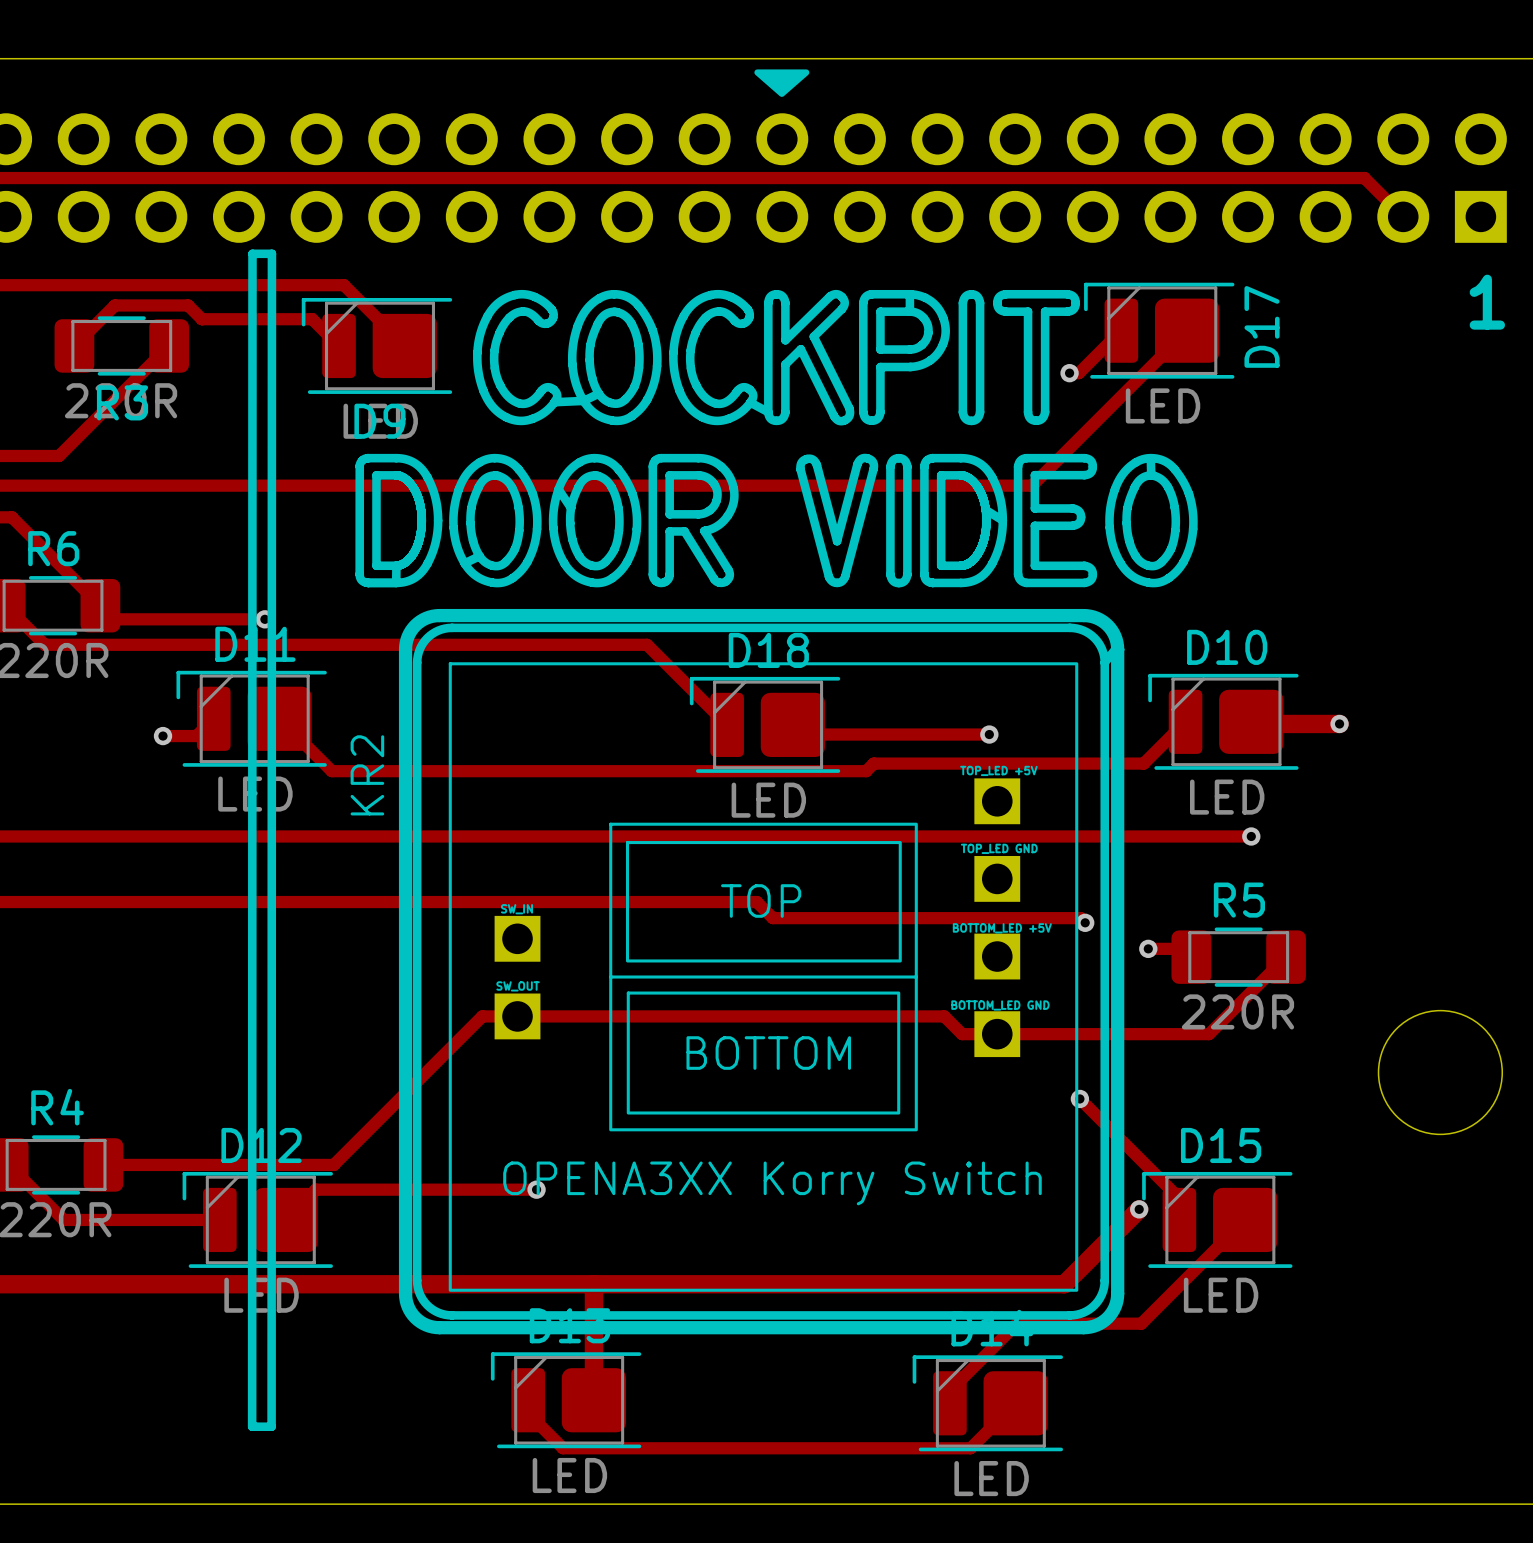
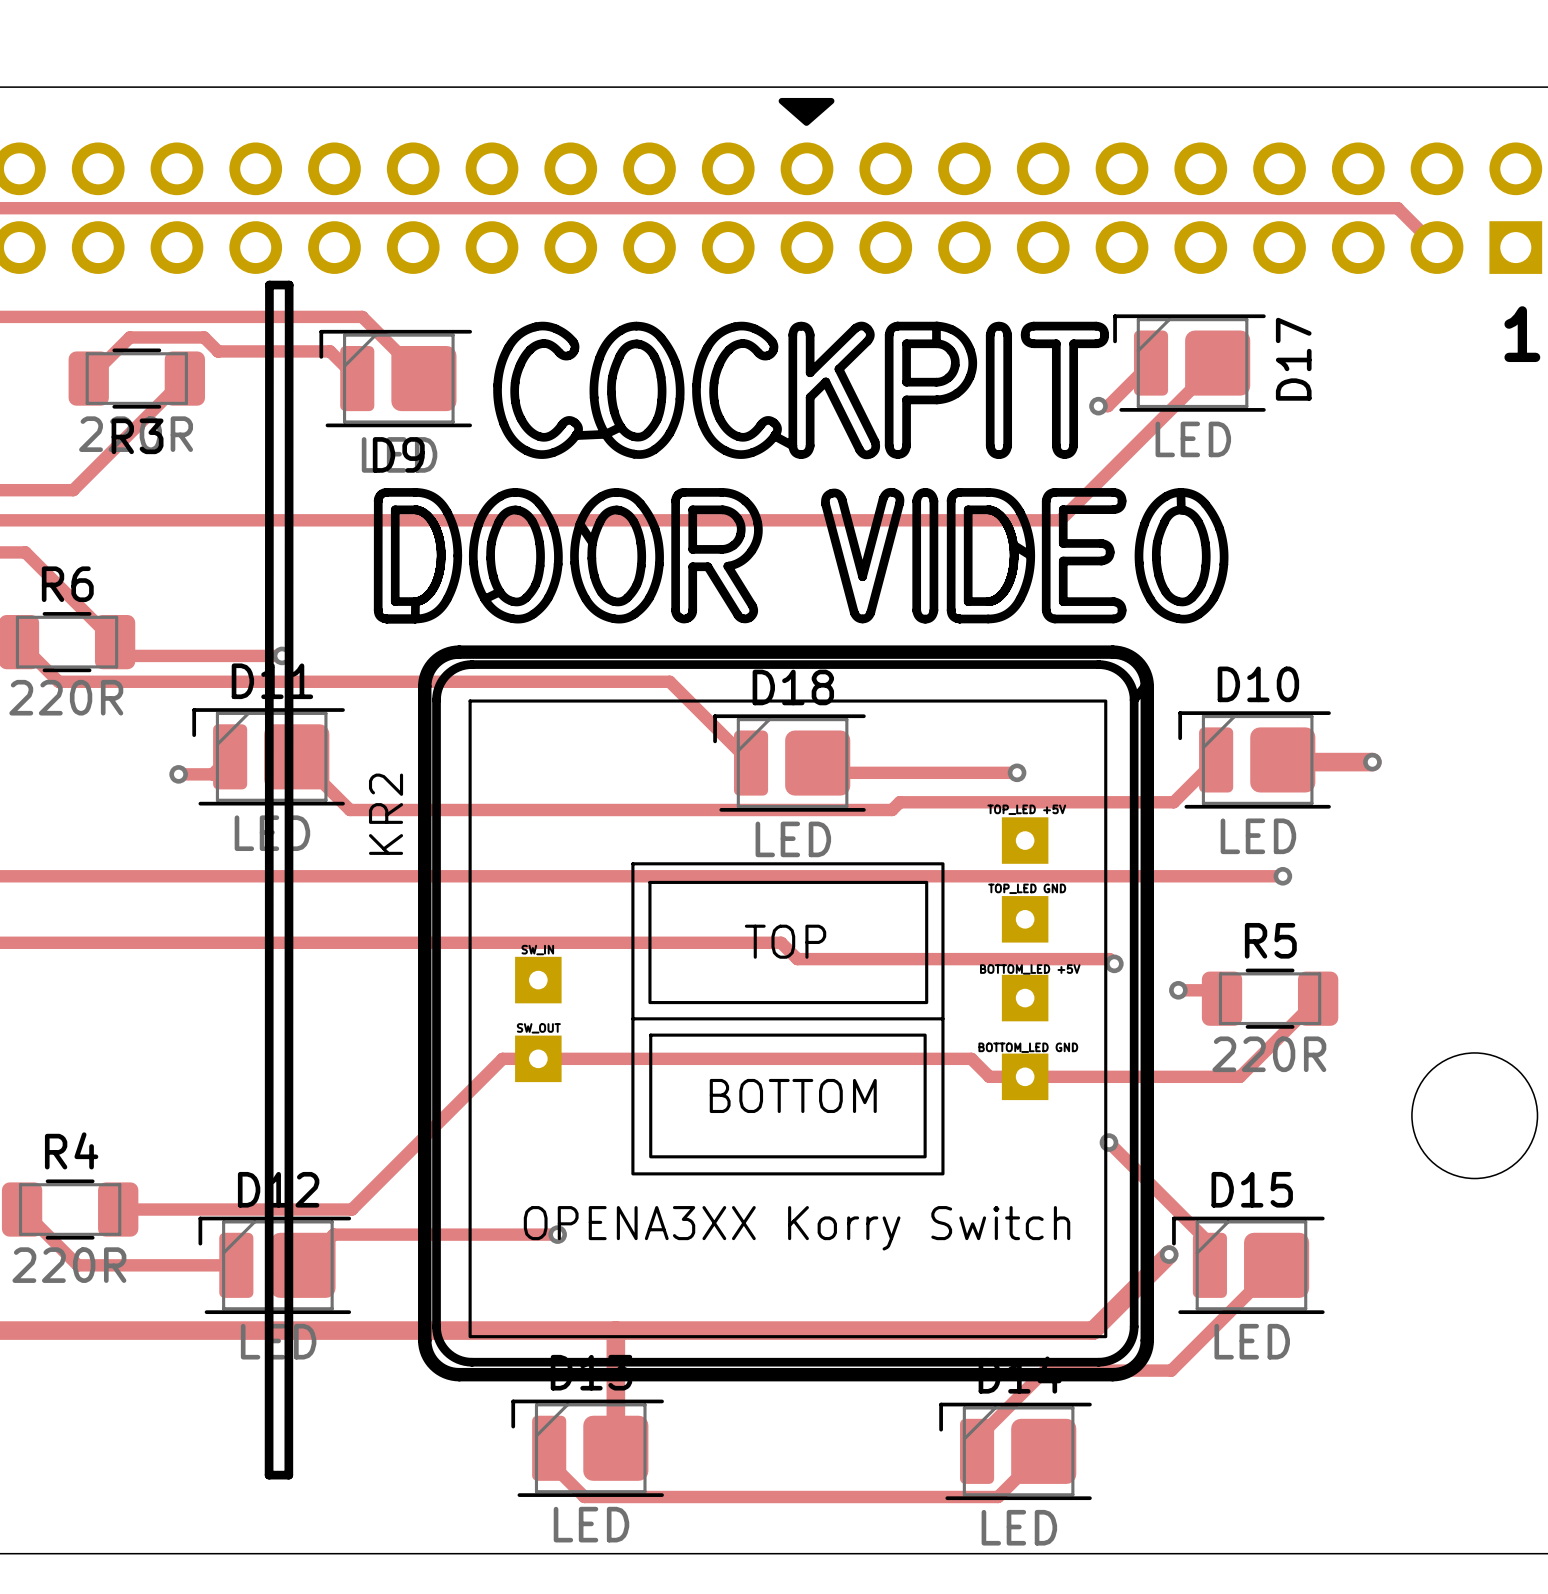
KR2 footprint: [448, 662, 1079, 1292] -> [468, 699, 1108, 1339]

